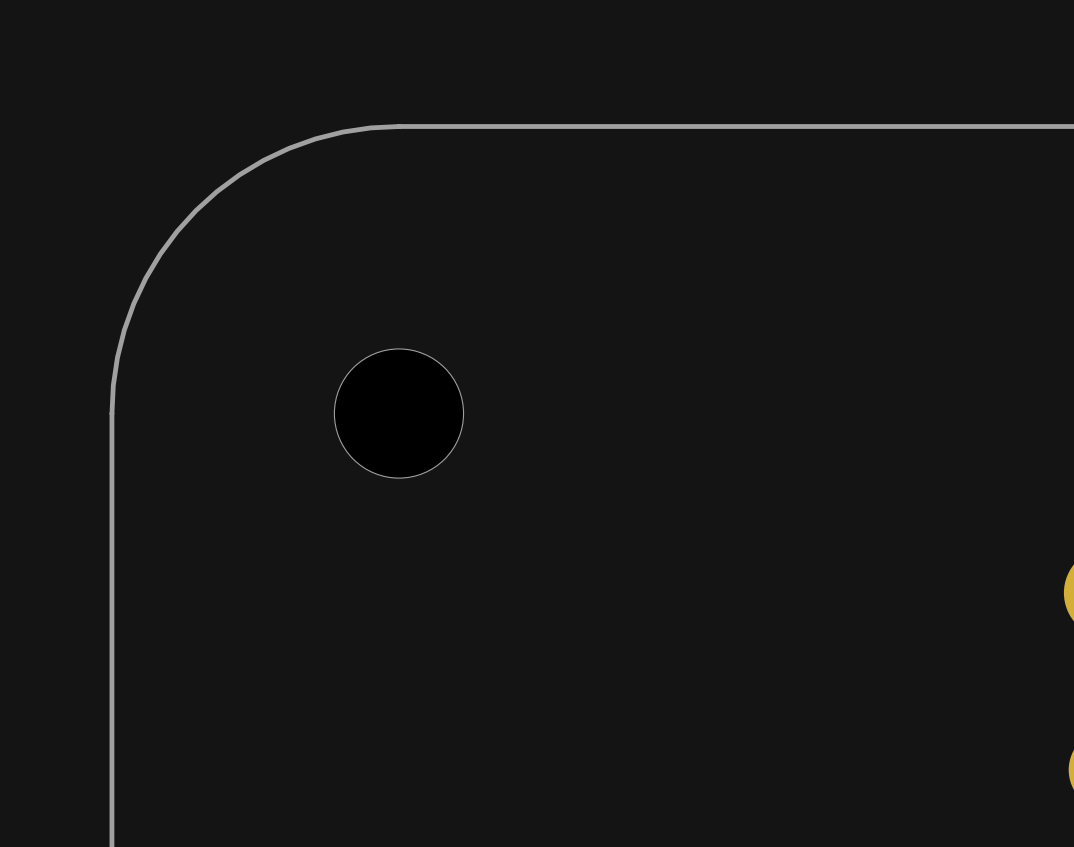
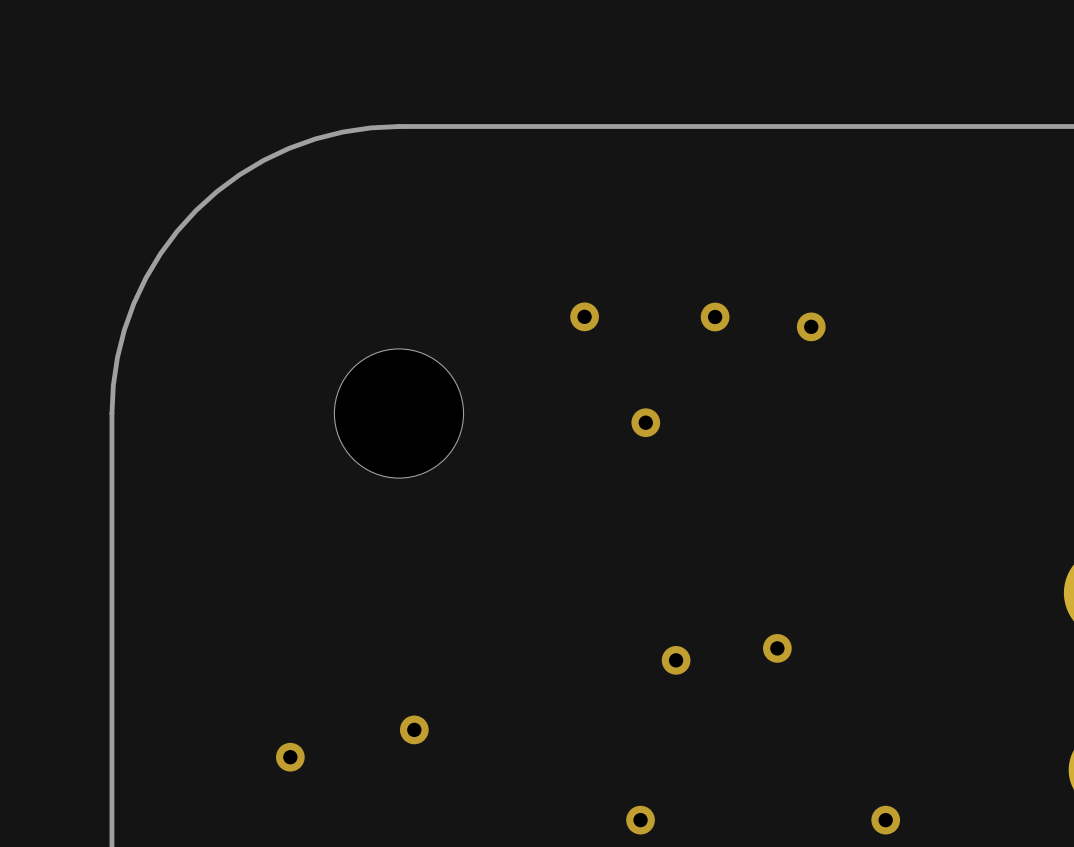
via: none -> (584, 316)
via: none -> (715, 317)
via: none -> (811, 326)
via: none -> (645, 422)
via: none -> (777, 648)
via: none -> (676, 660)
via: none -> (414, 729)
via: none -> (290, 757)
via: none -> (640, 820)
via: none -> (885, 820)

